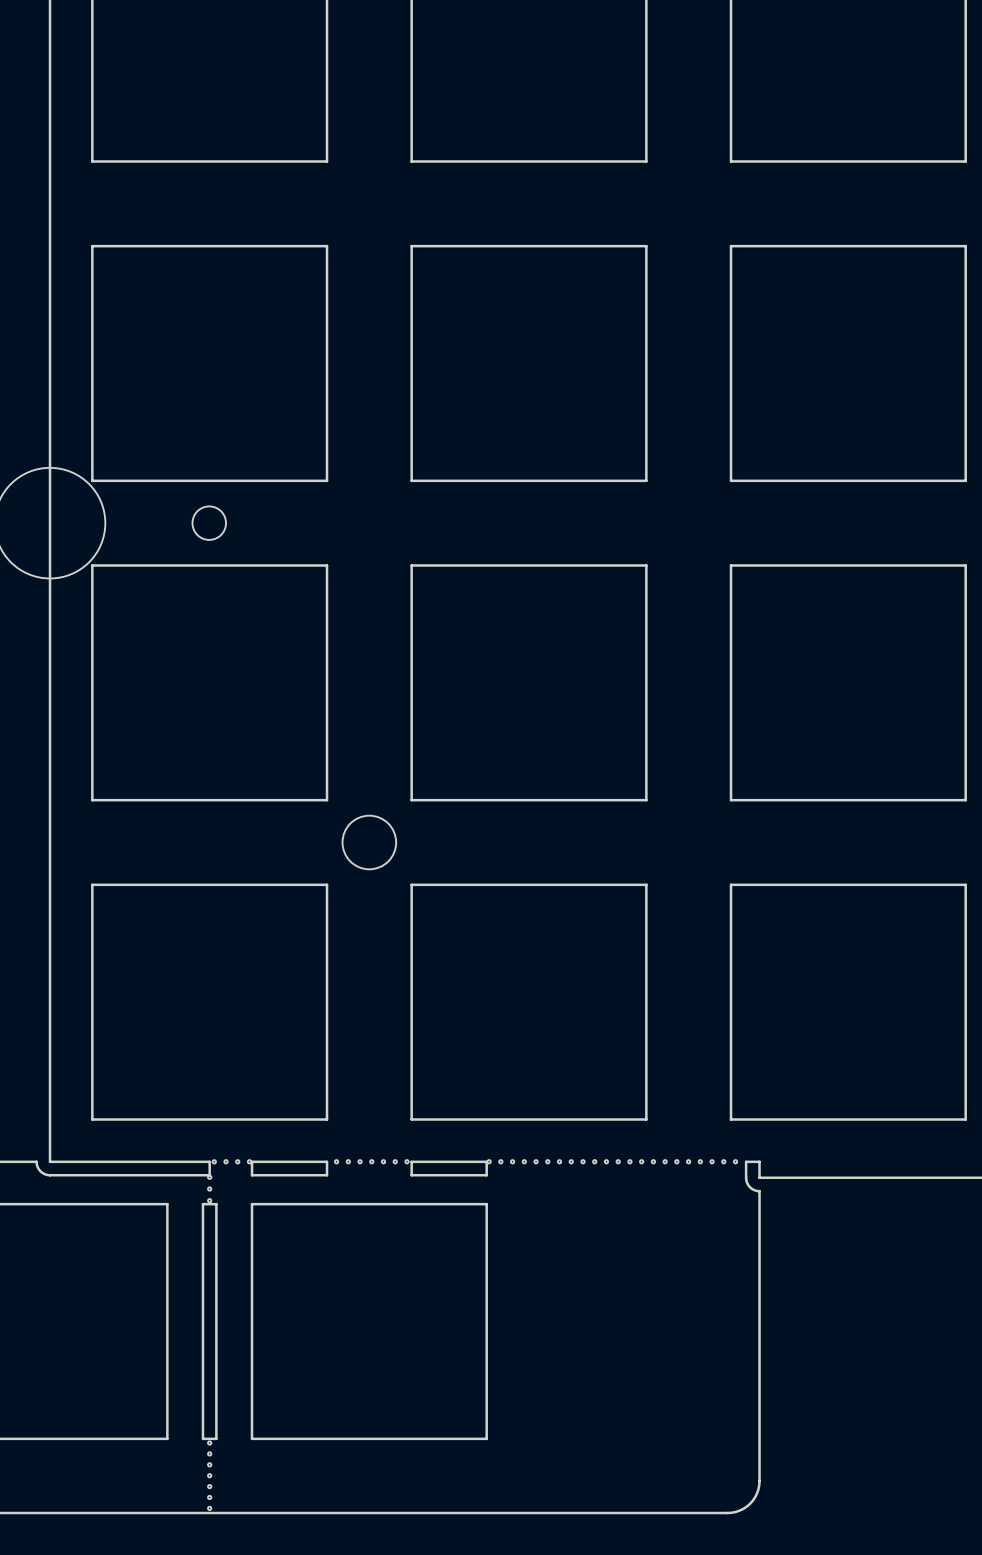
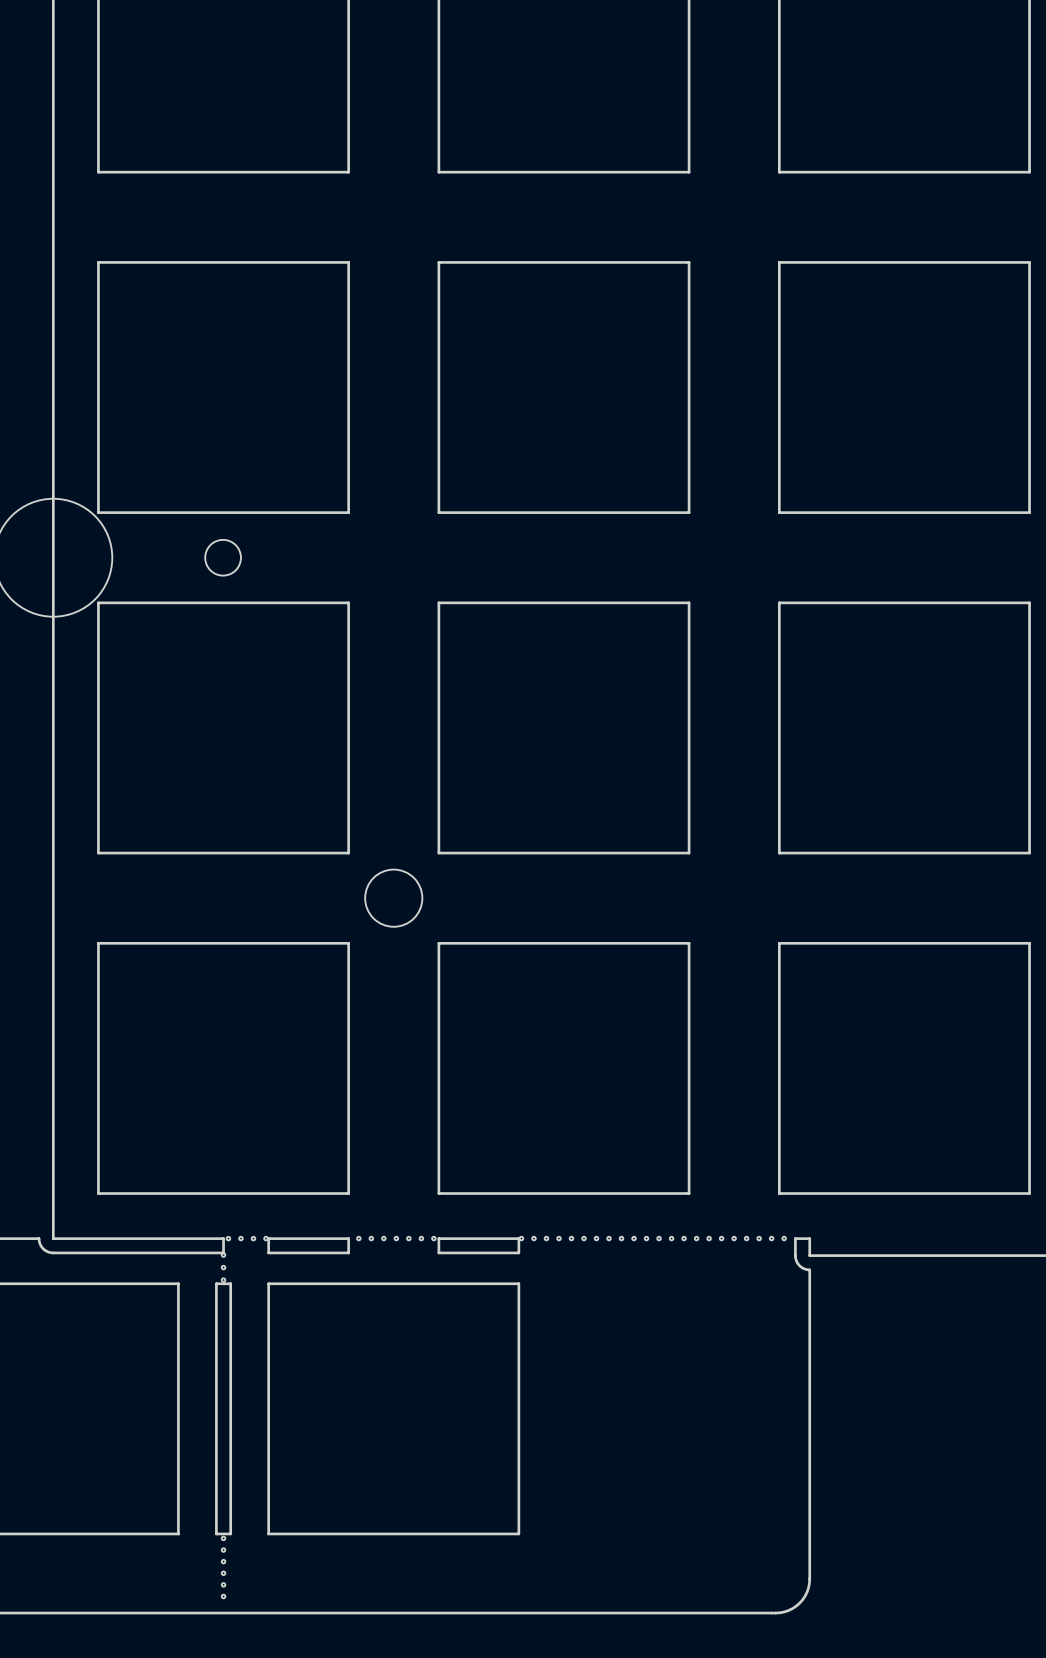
part: (209, 1508) -> none

